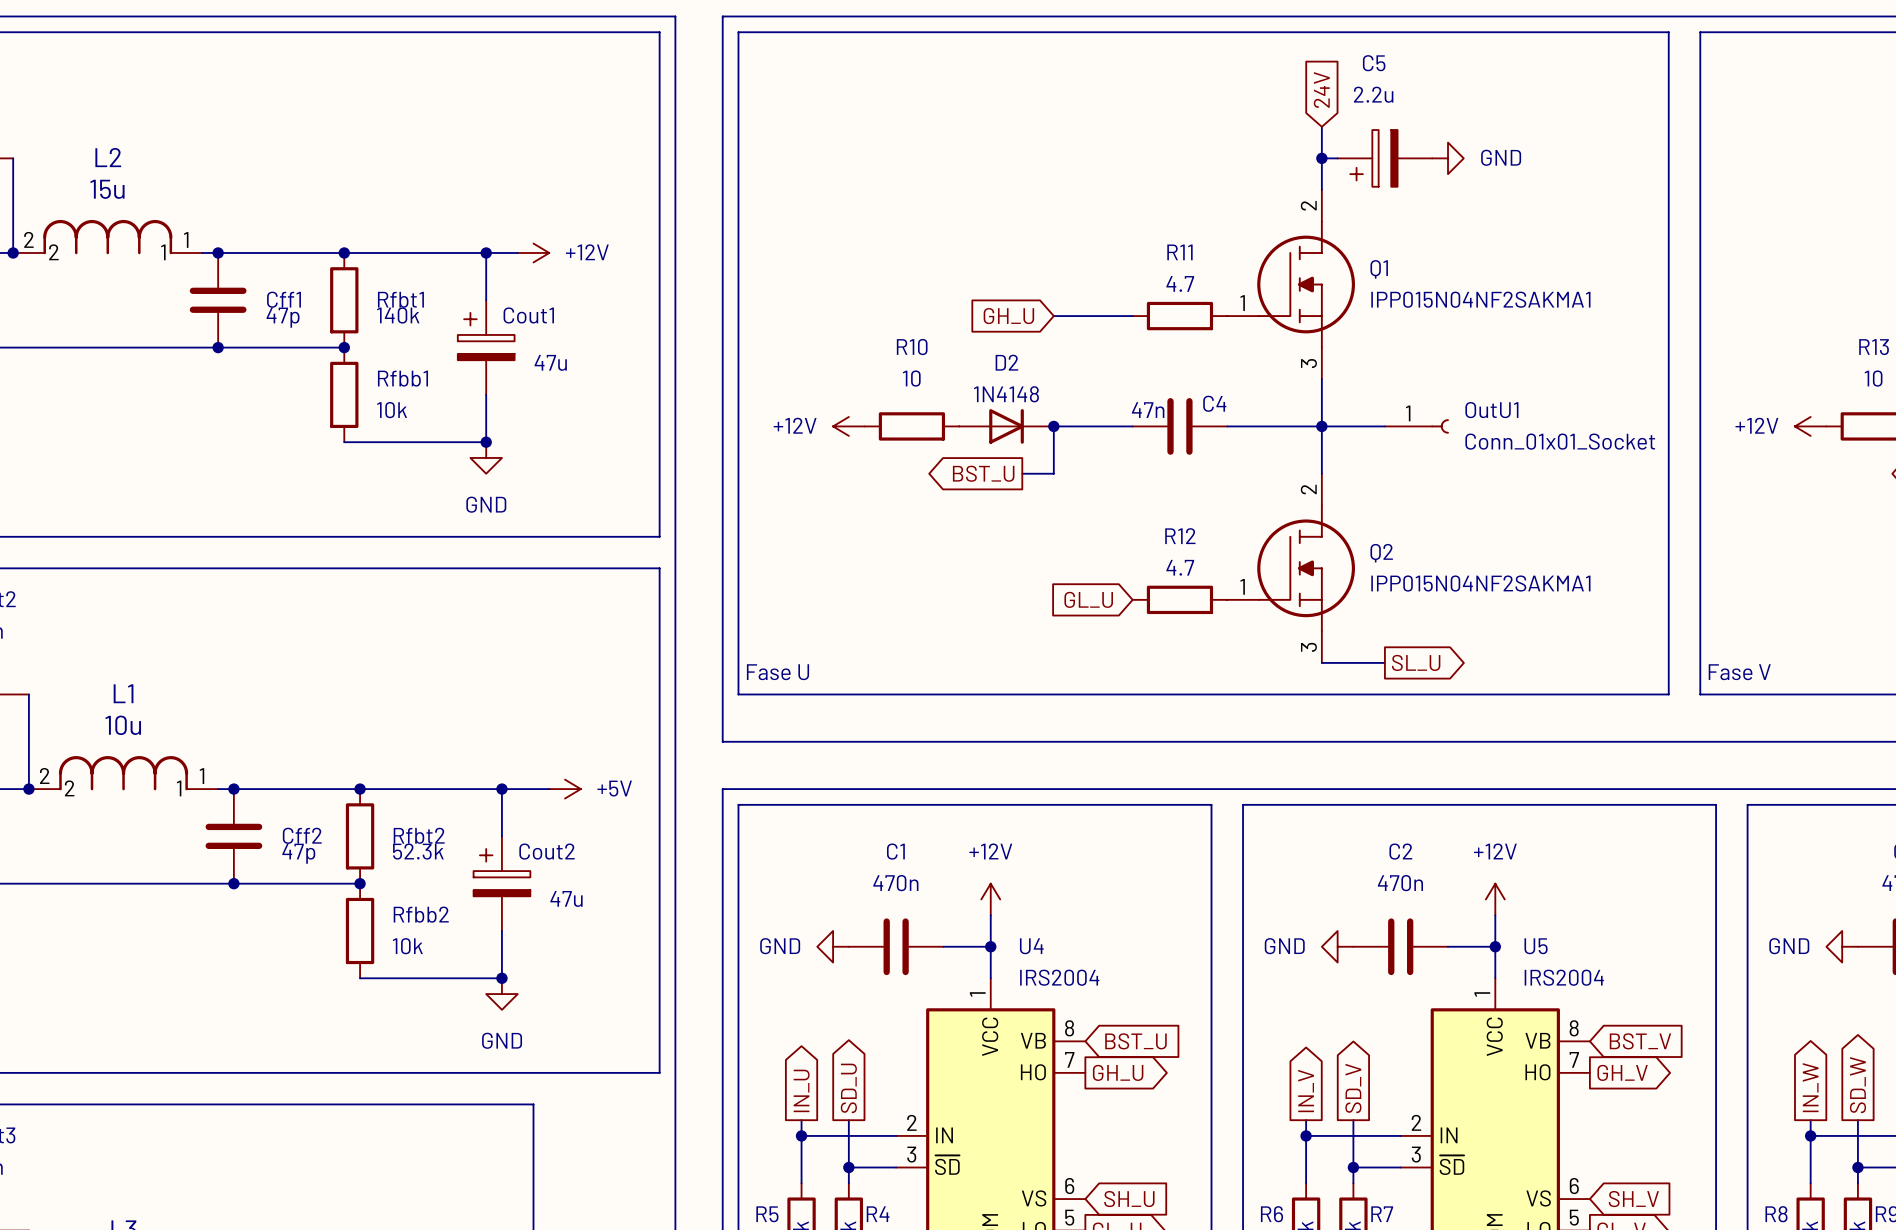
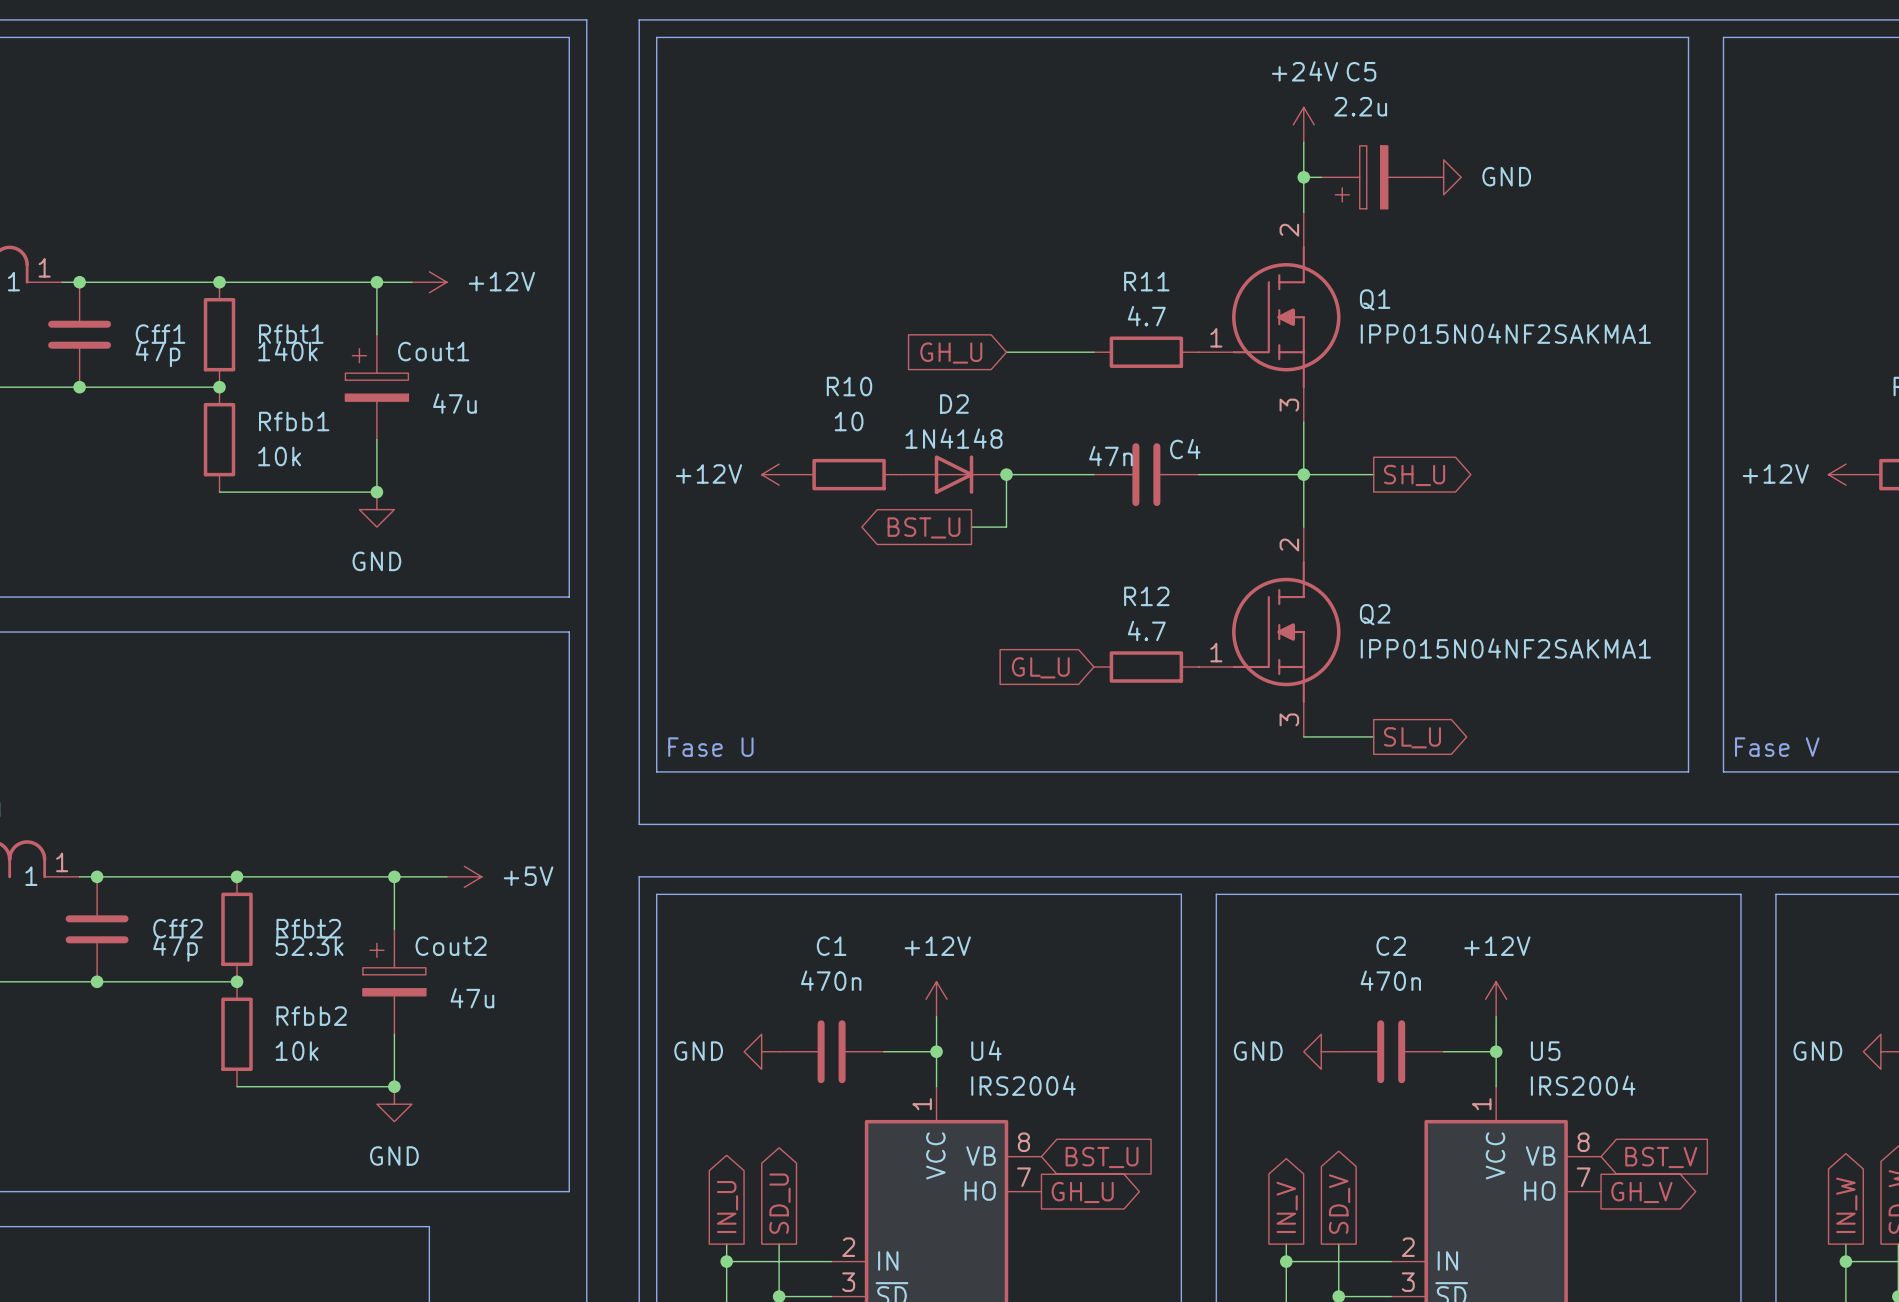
global label: 24V (1321, 89) -> none
power symbol: none -> +24V (1303, 124)
OutU1: Conn_01x01_Socket (1416, 426) -> none
global label: none -> SH_U (1414, 475)

